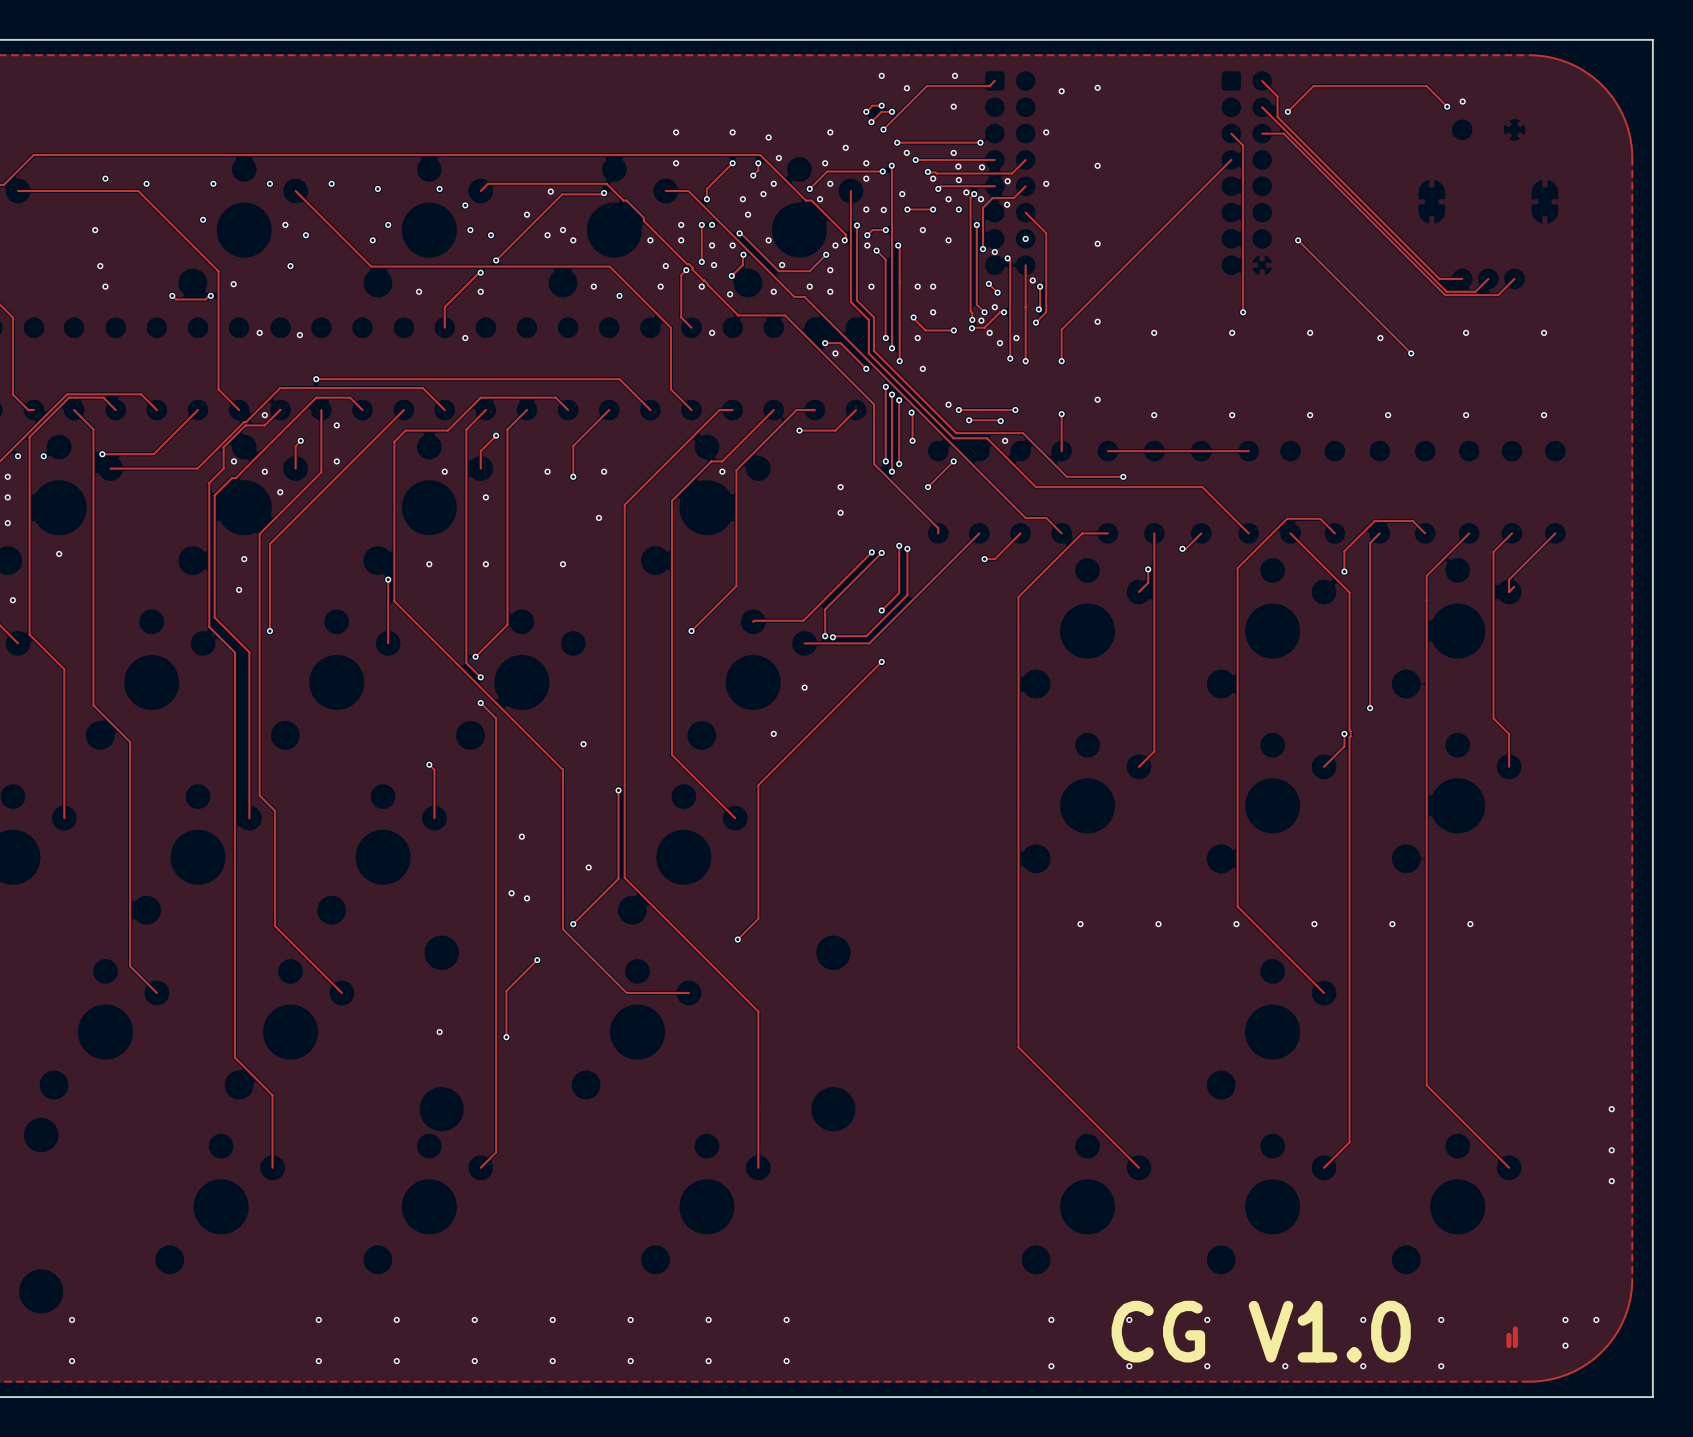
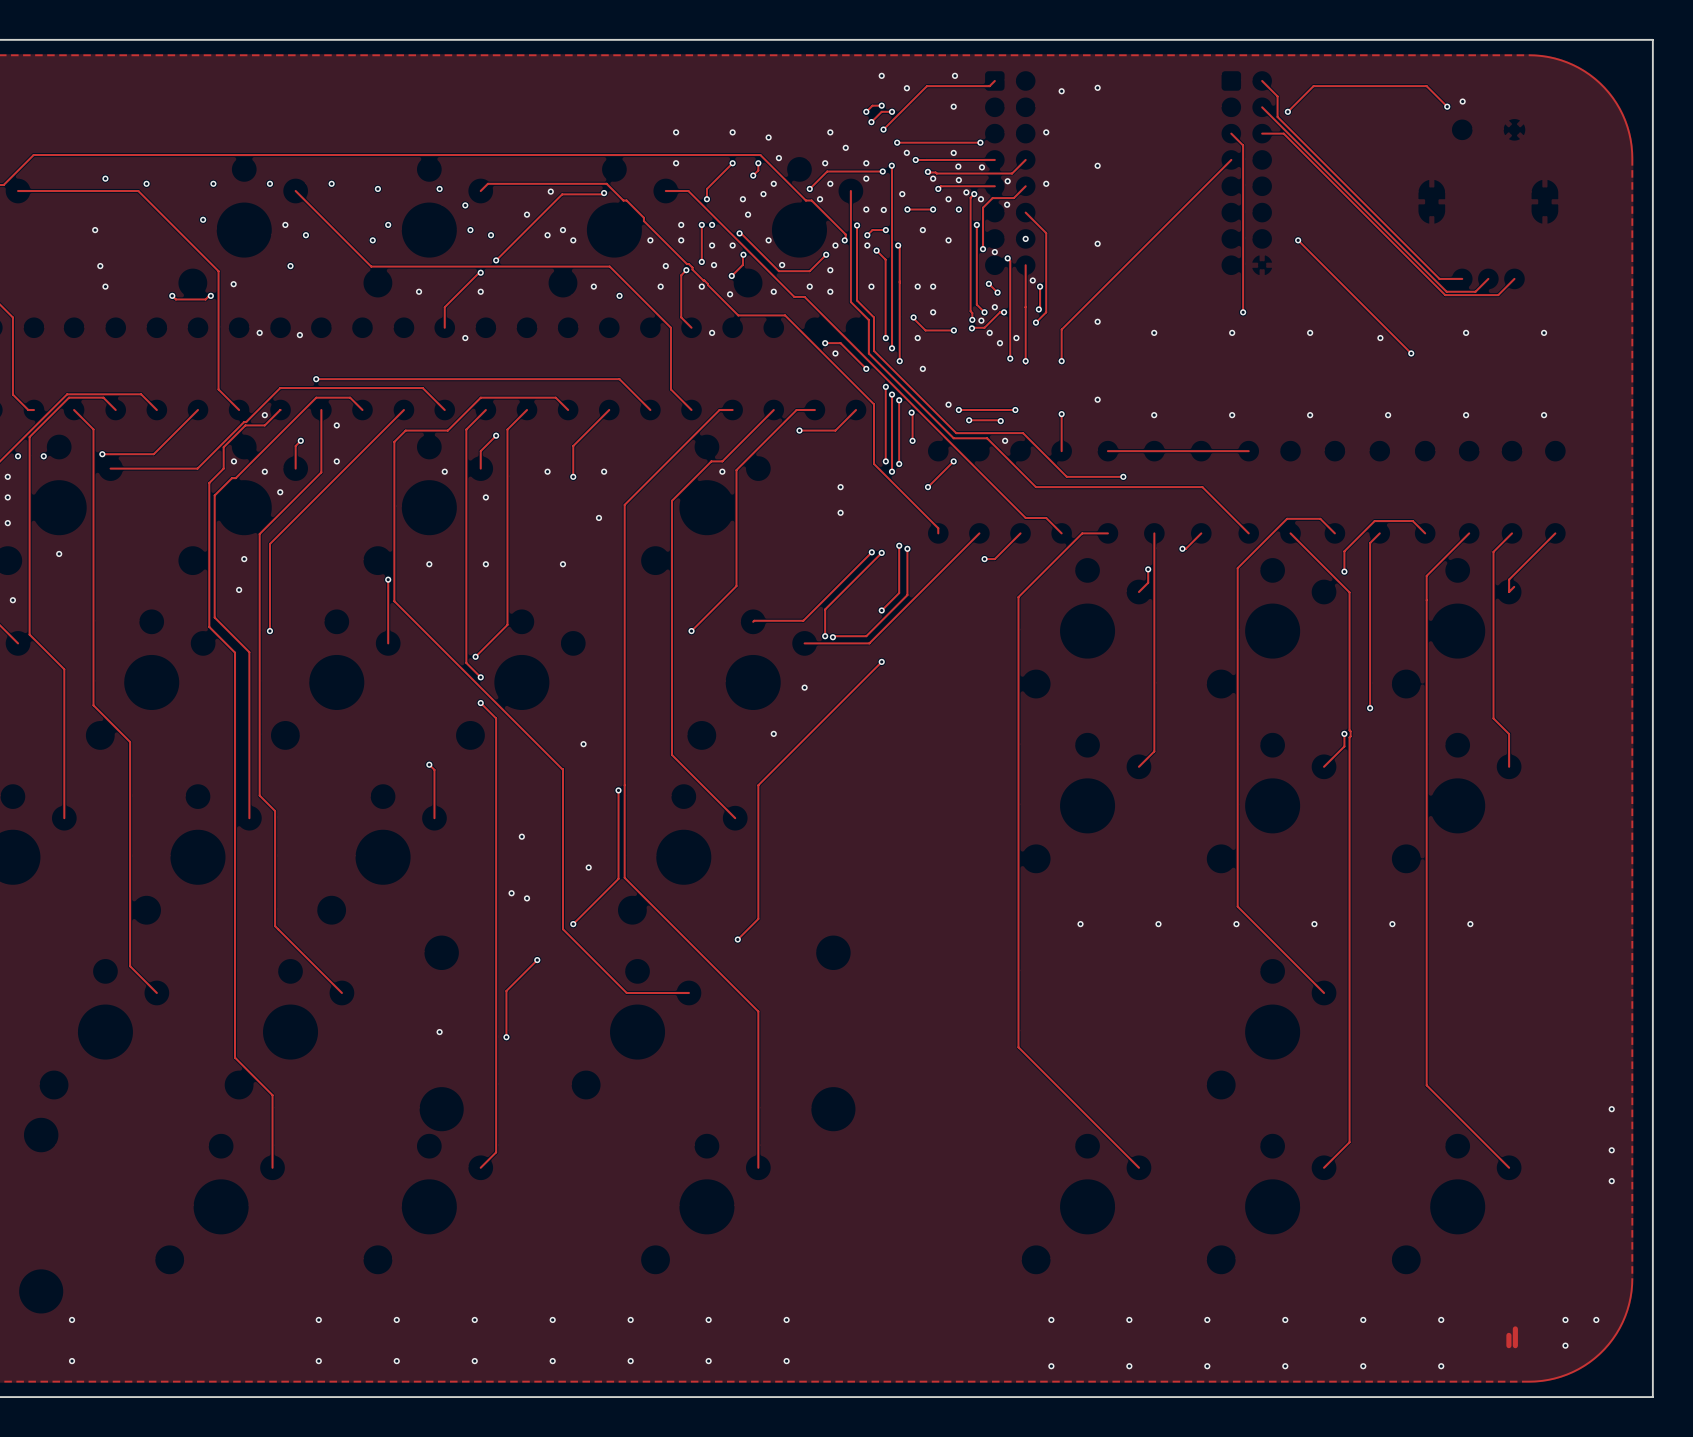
text: CG V1.0 (1261, 1331) -> none

